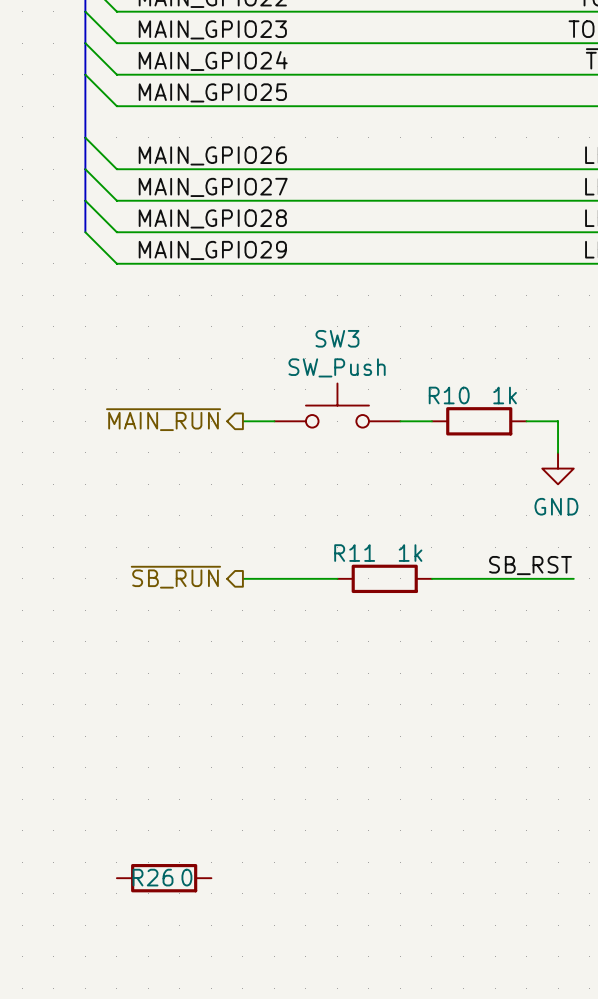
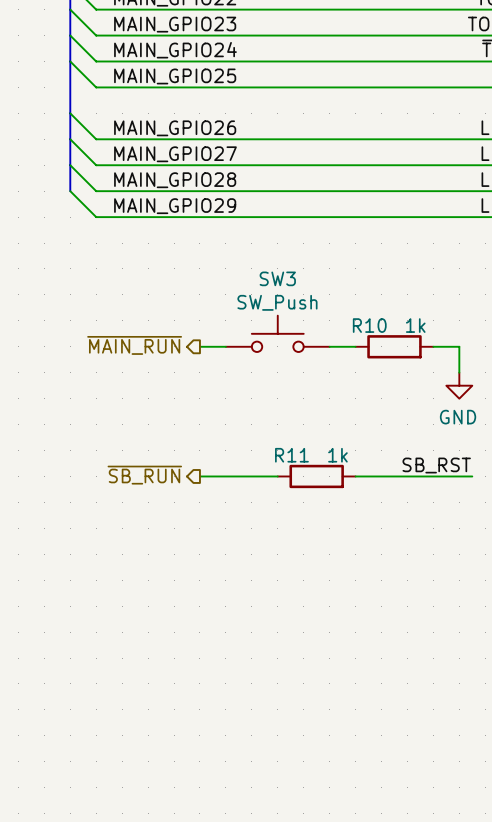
R26: 0 (164, 878) -> none

